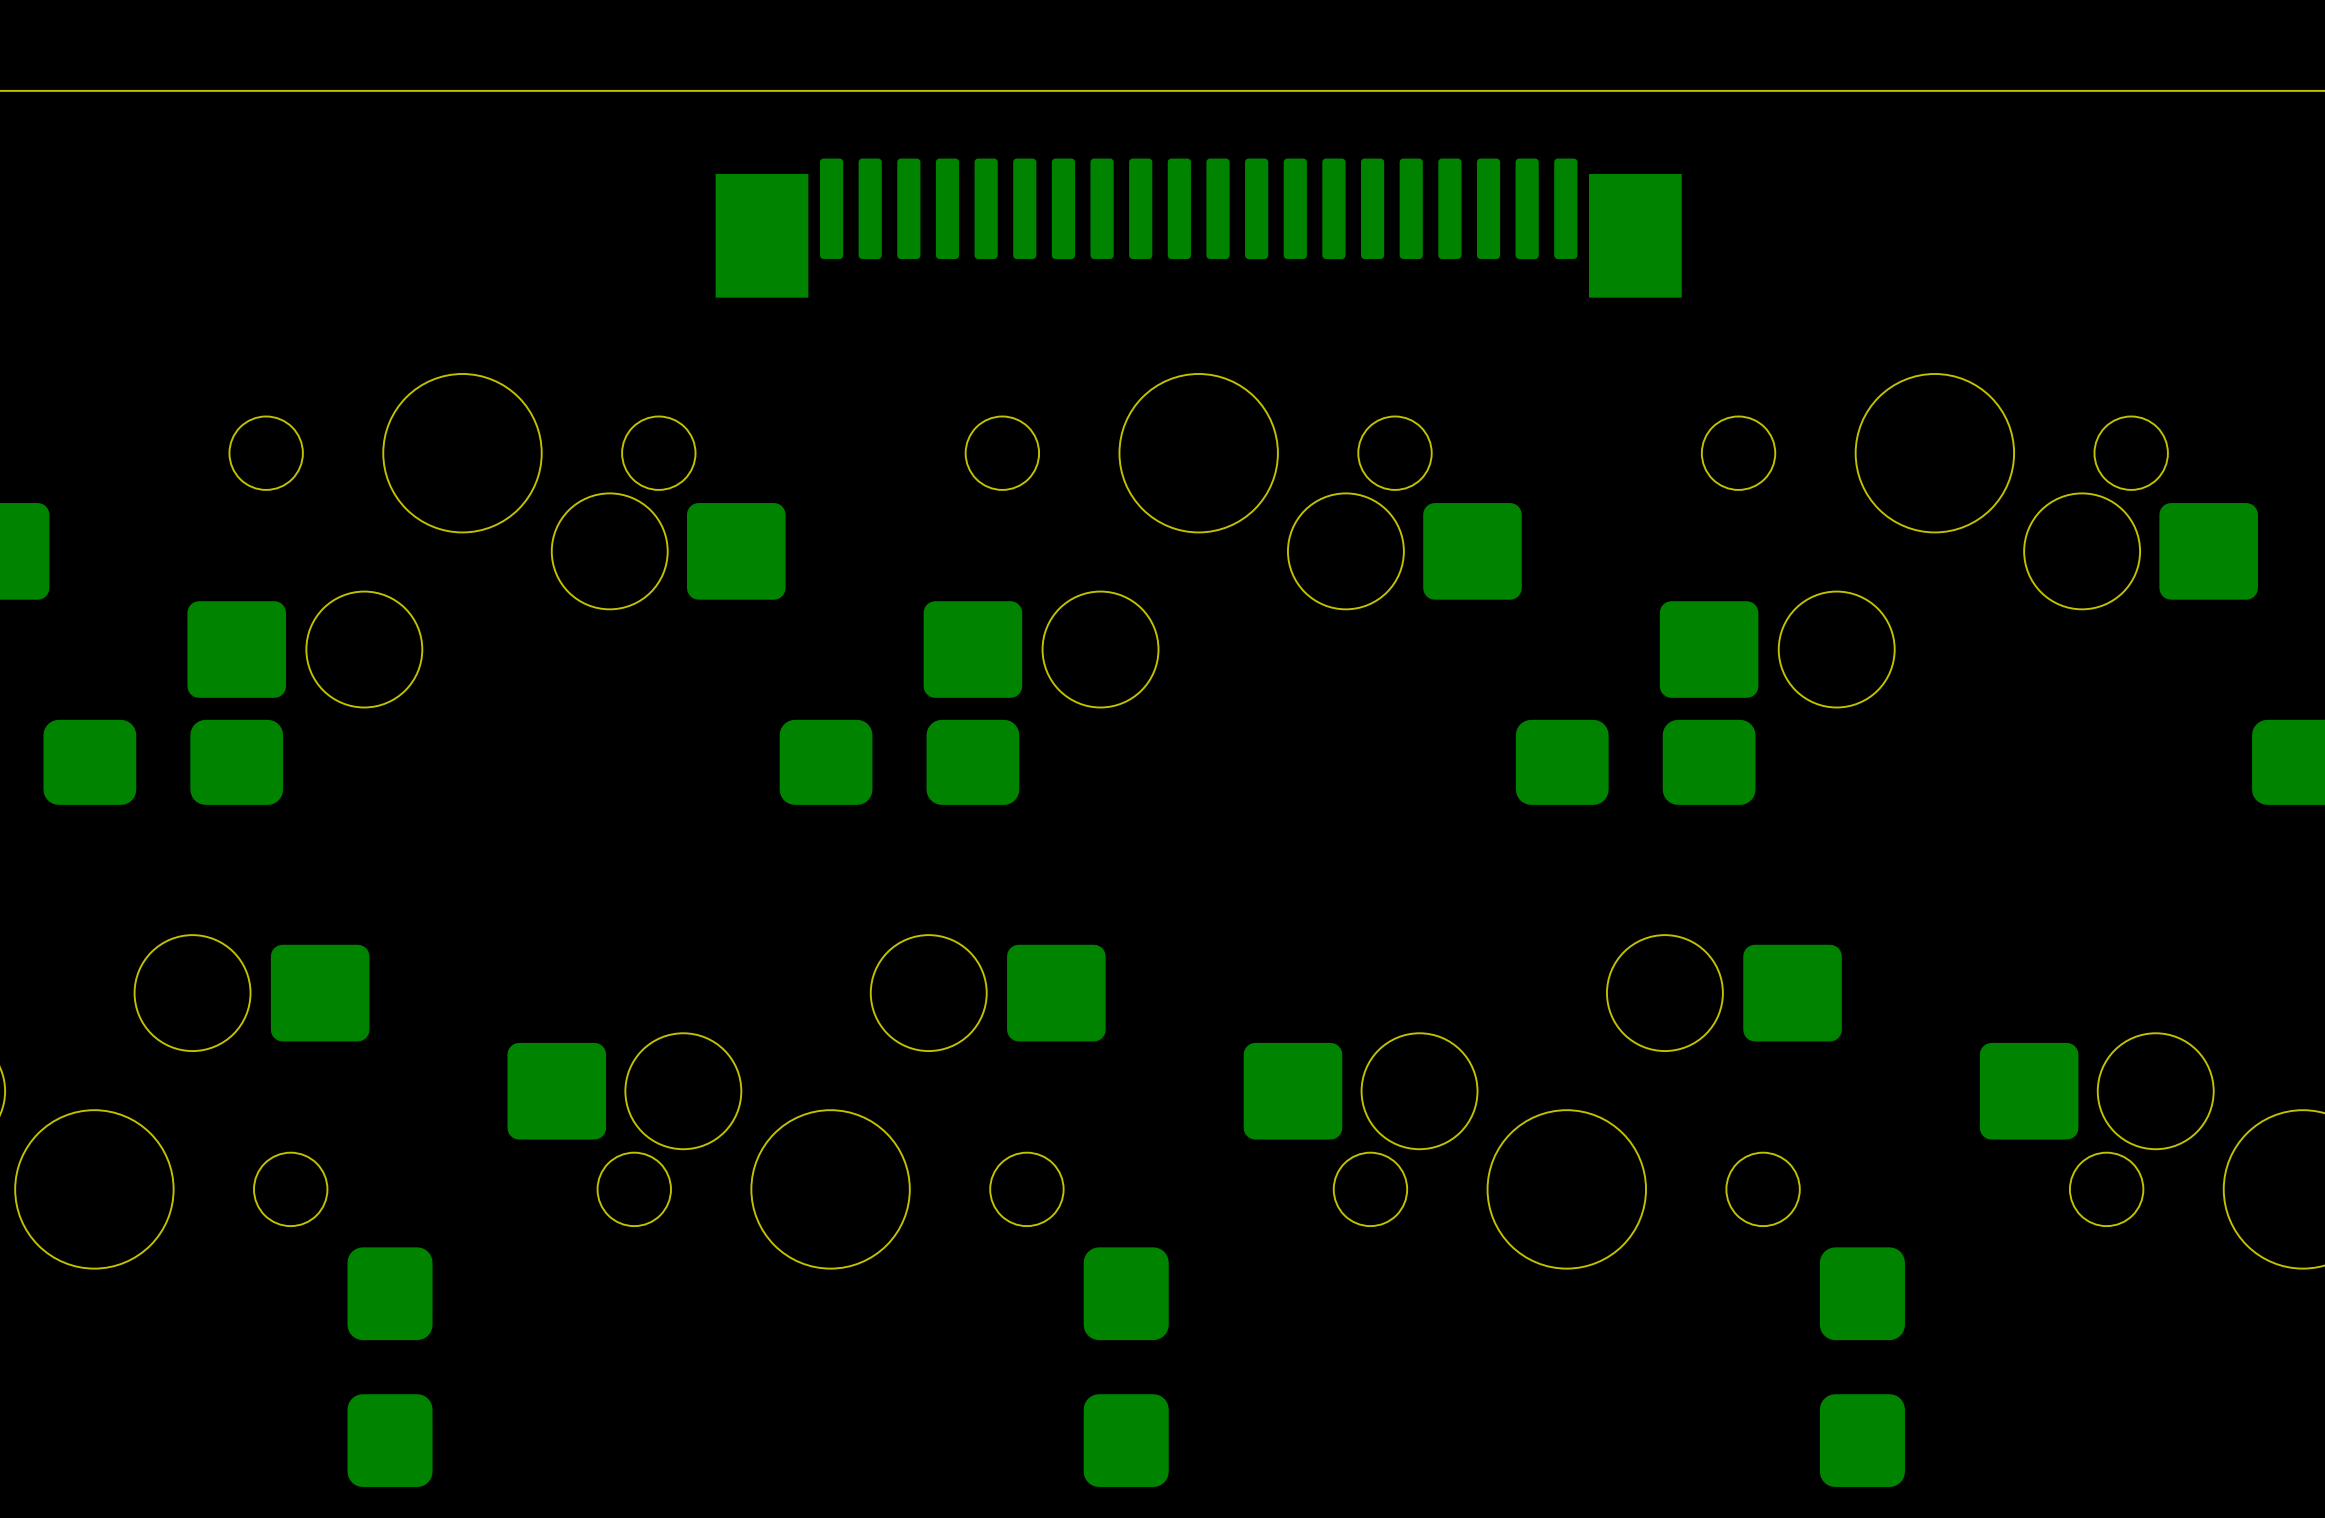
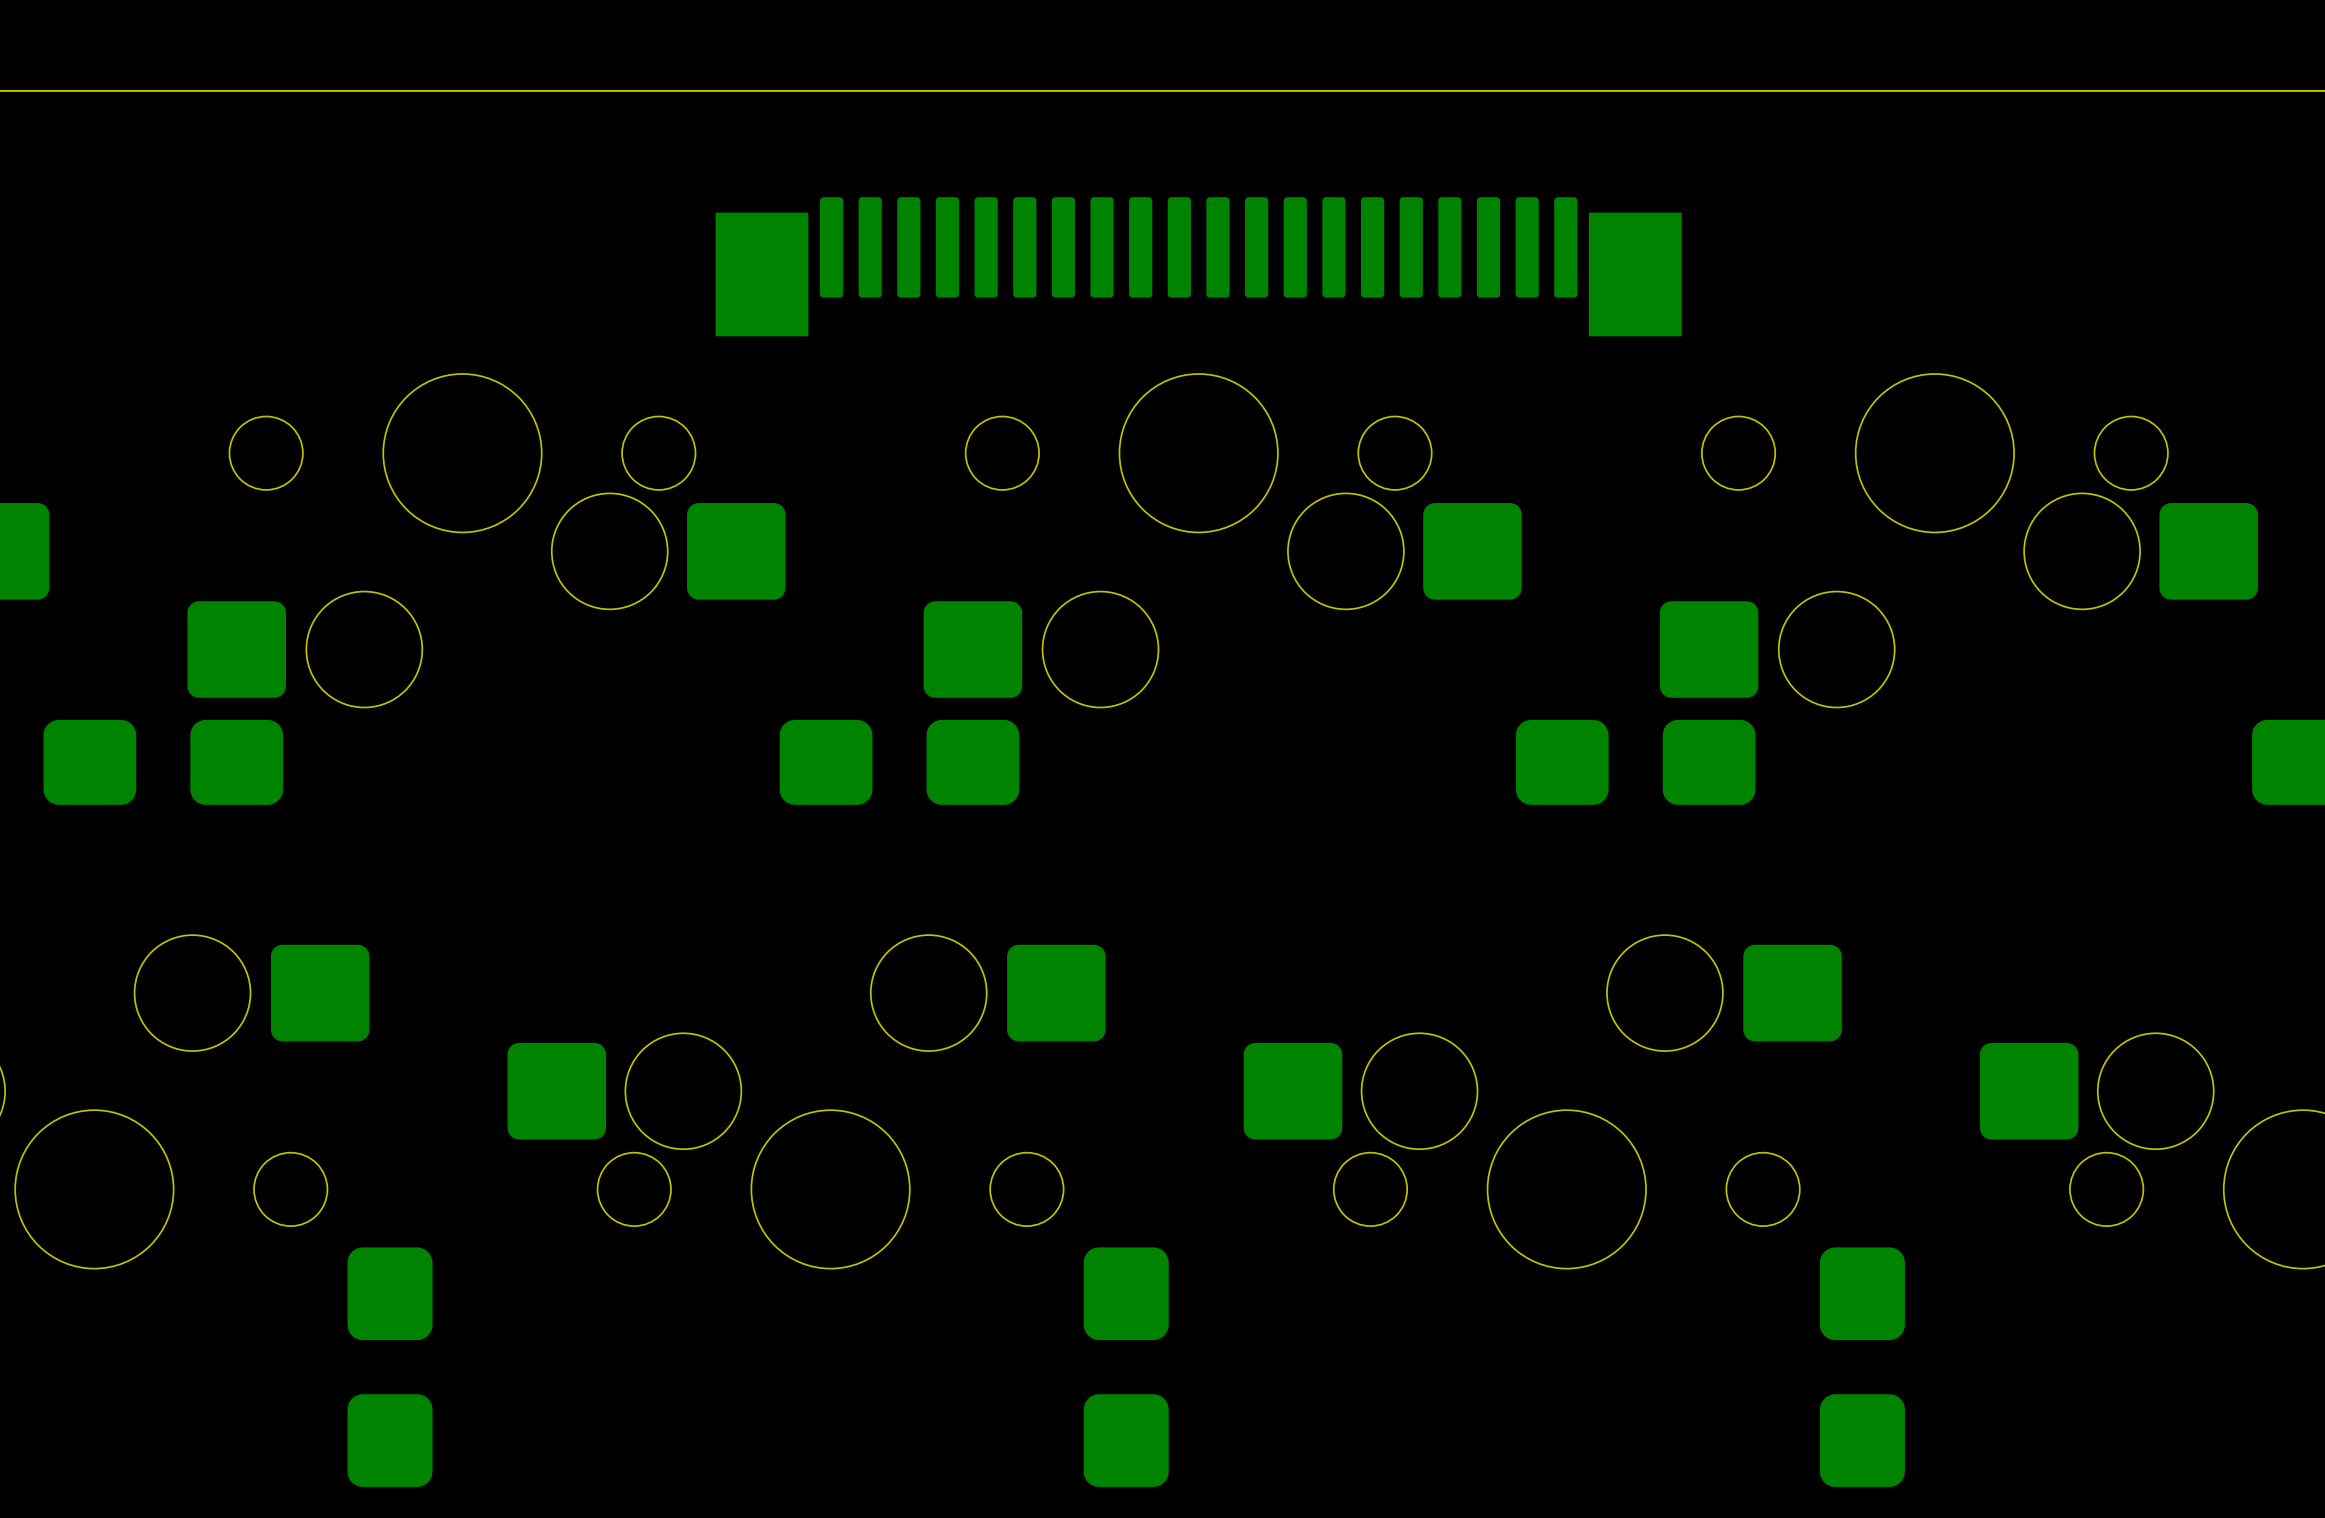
part position: (1198, 228) -> (1198, 266)

